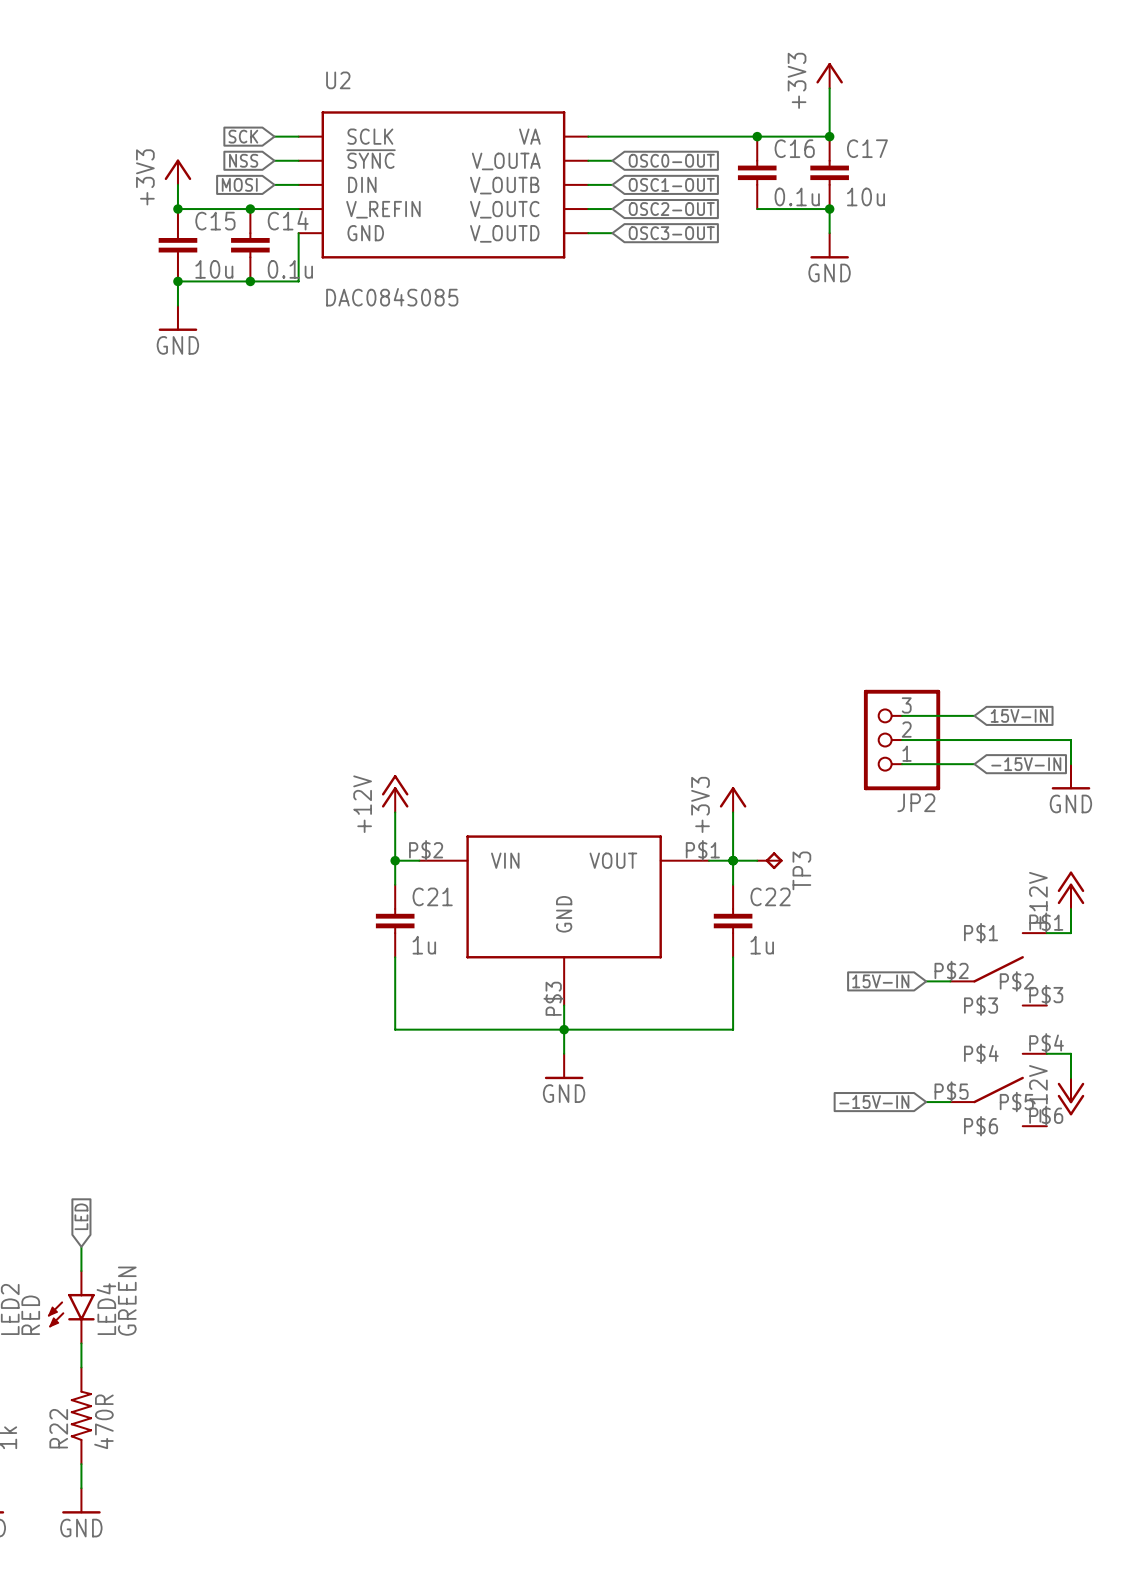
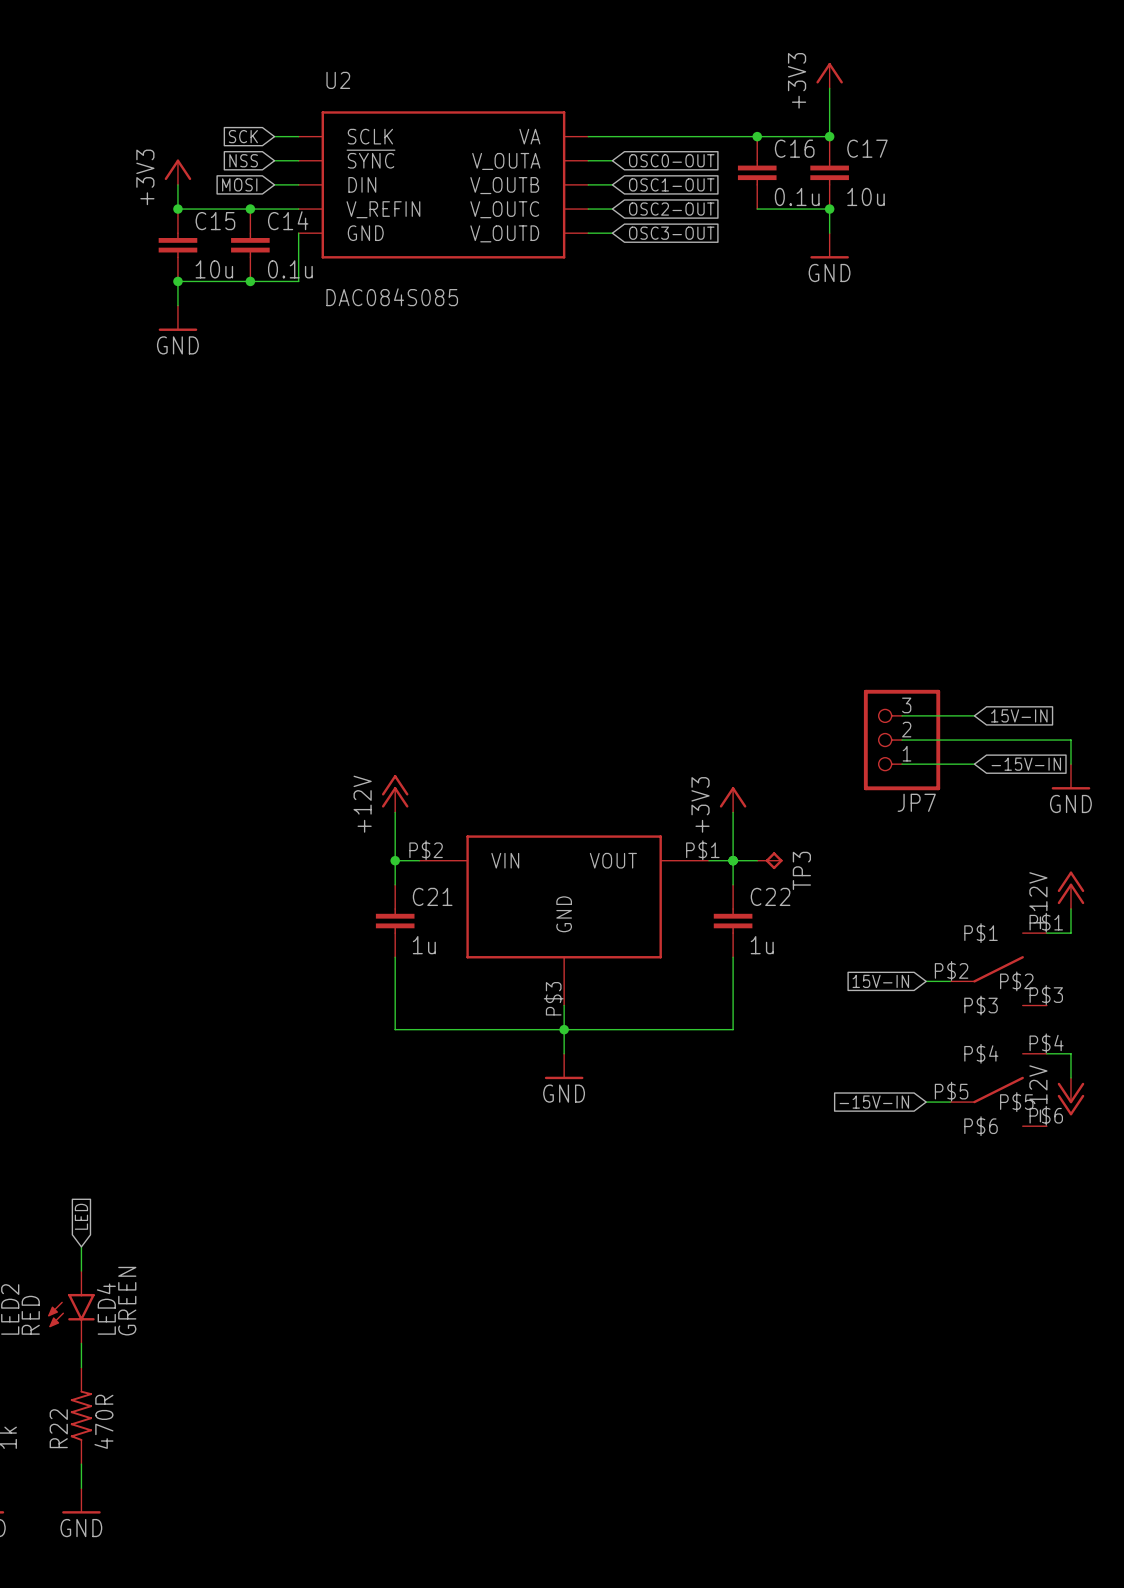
JP2 name: JP2 (916, 802) -> JP7 (916, 802)

